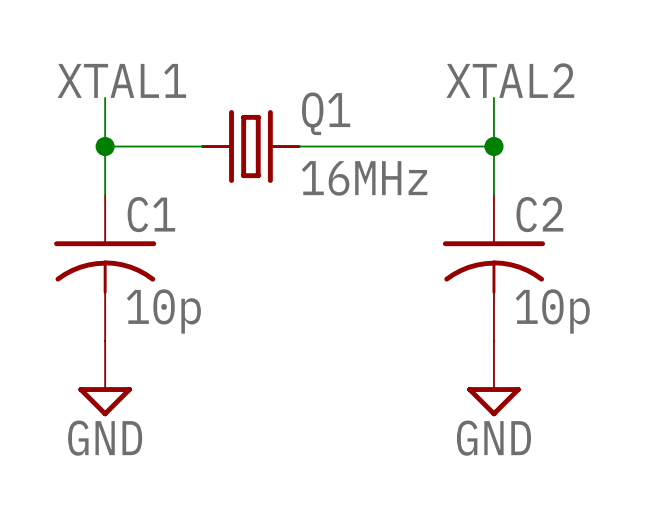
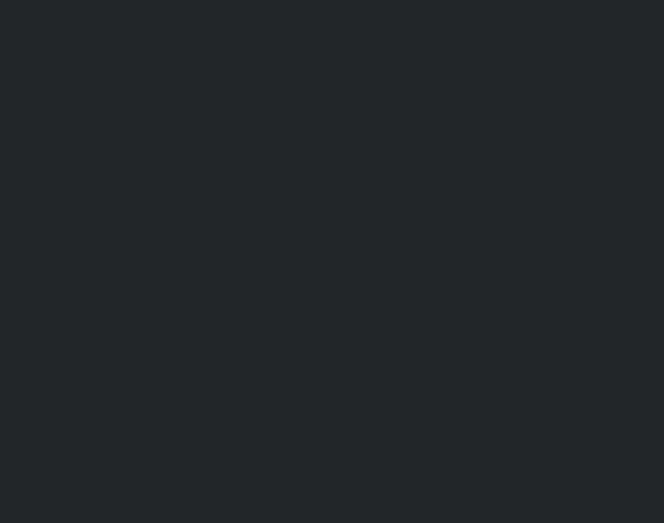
label: XTAL1 (121, 80) -> none
label: XTAL2 (510, 80) -> none
wire: (105, 97) (105, 195) -> none
wire: (493, 97) (493, 195) -> none
wire: (105, 146) (202, 146) -> none
junction: (105, 146) -> none
Q1: 16MHz (250, 146) -> none
wire: (299, 146) (493, 146) -> none
junction: (493, 146) -> none
C1: 10p (105, 268) -> none
C2: 10p (493, 268) -> none
power symbol: GND (105, 378) -> none
power symbol: GND (493, 378) -> none

